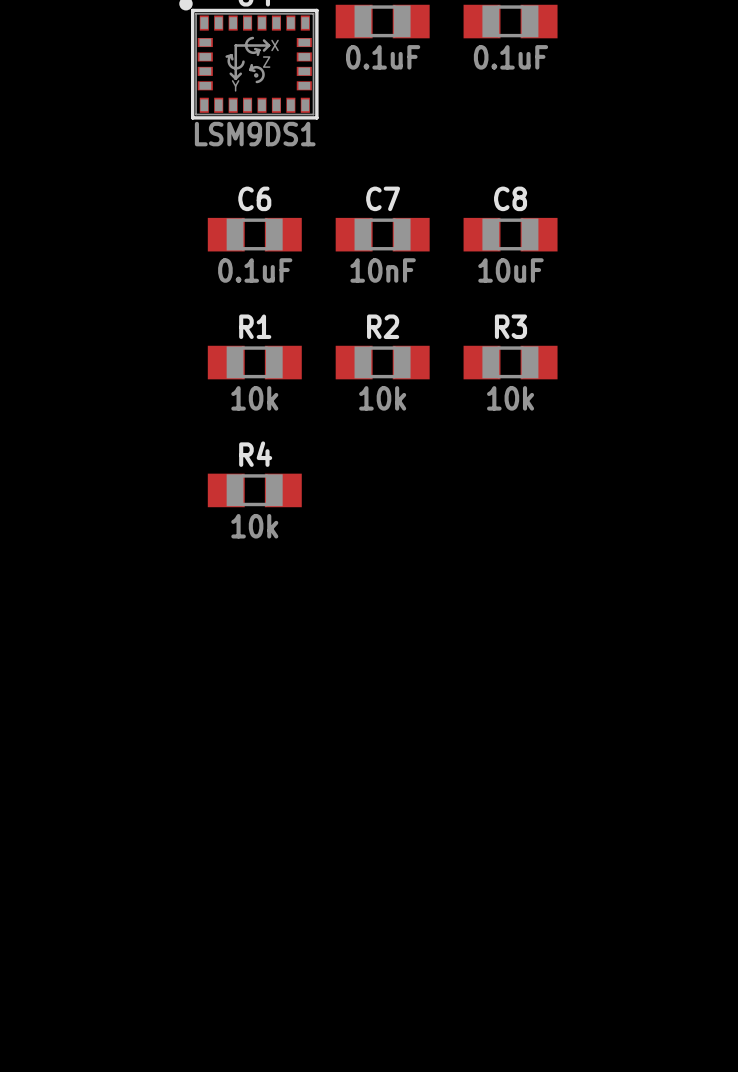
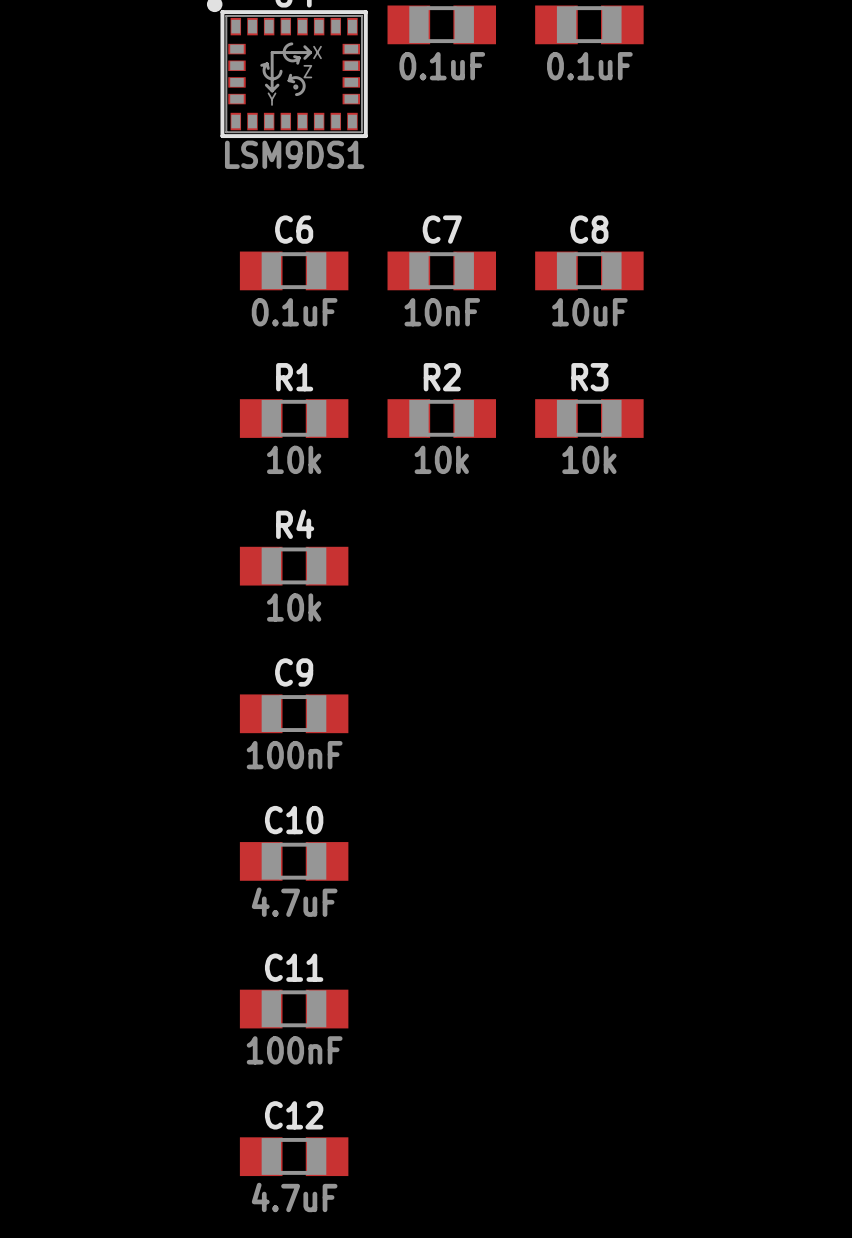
C9: none -> 100nF (294, 713)
C10: none -> 4.7uF (294, 861)
C11: none -> 100nF (294, 1009)
C12: none -> 4.7uF (294, 1156)

